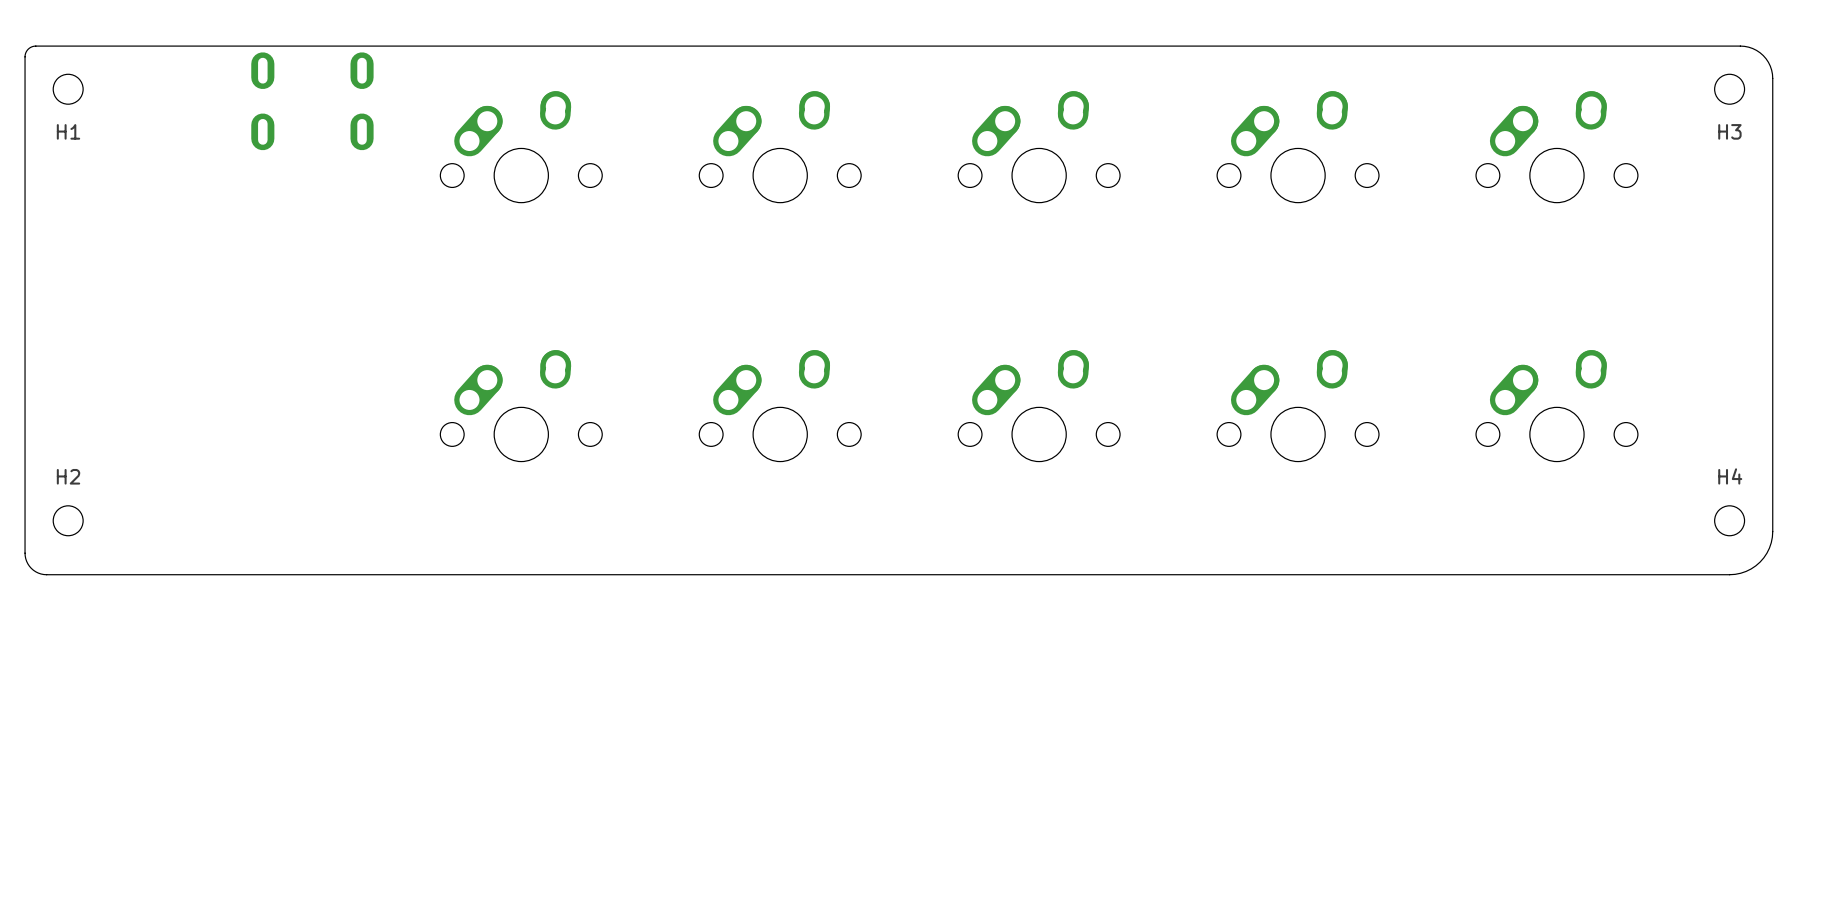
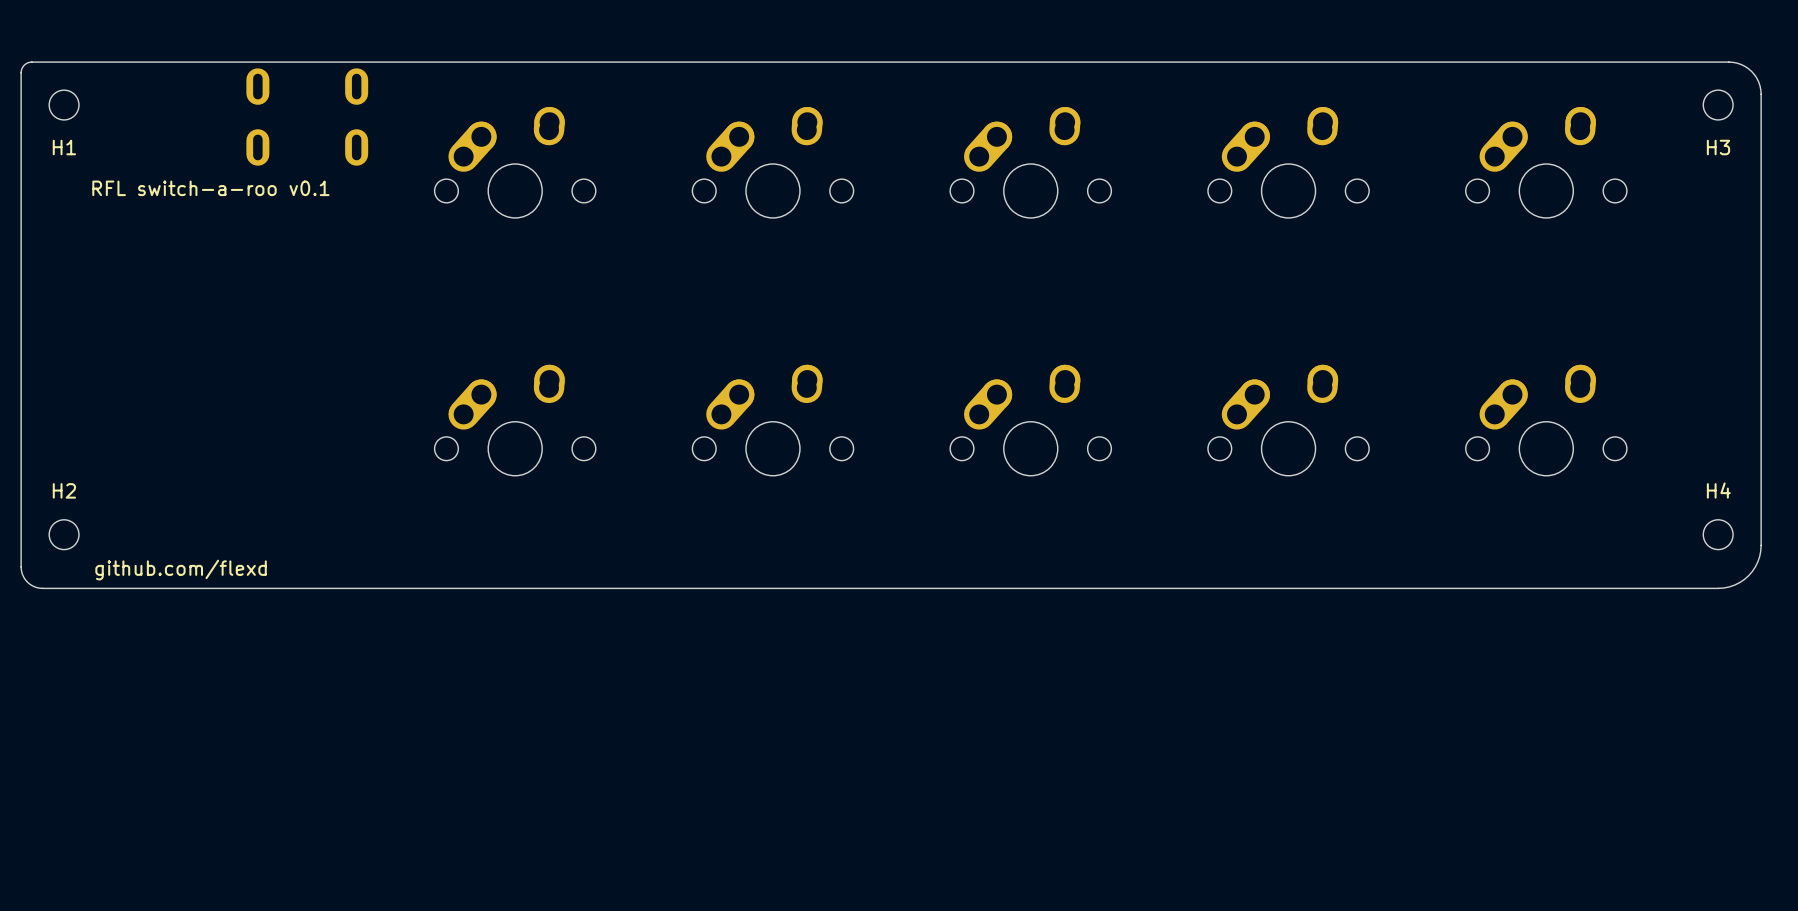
text: none -> RFL switch-a-roo v0.1 (210, 188)
text: none -> github.com/flexd (181, 570)

